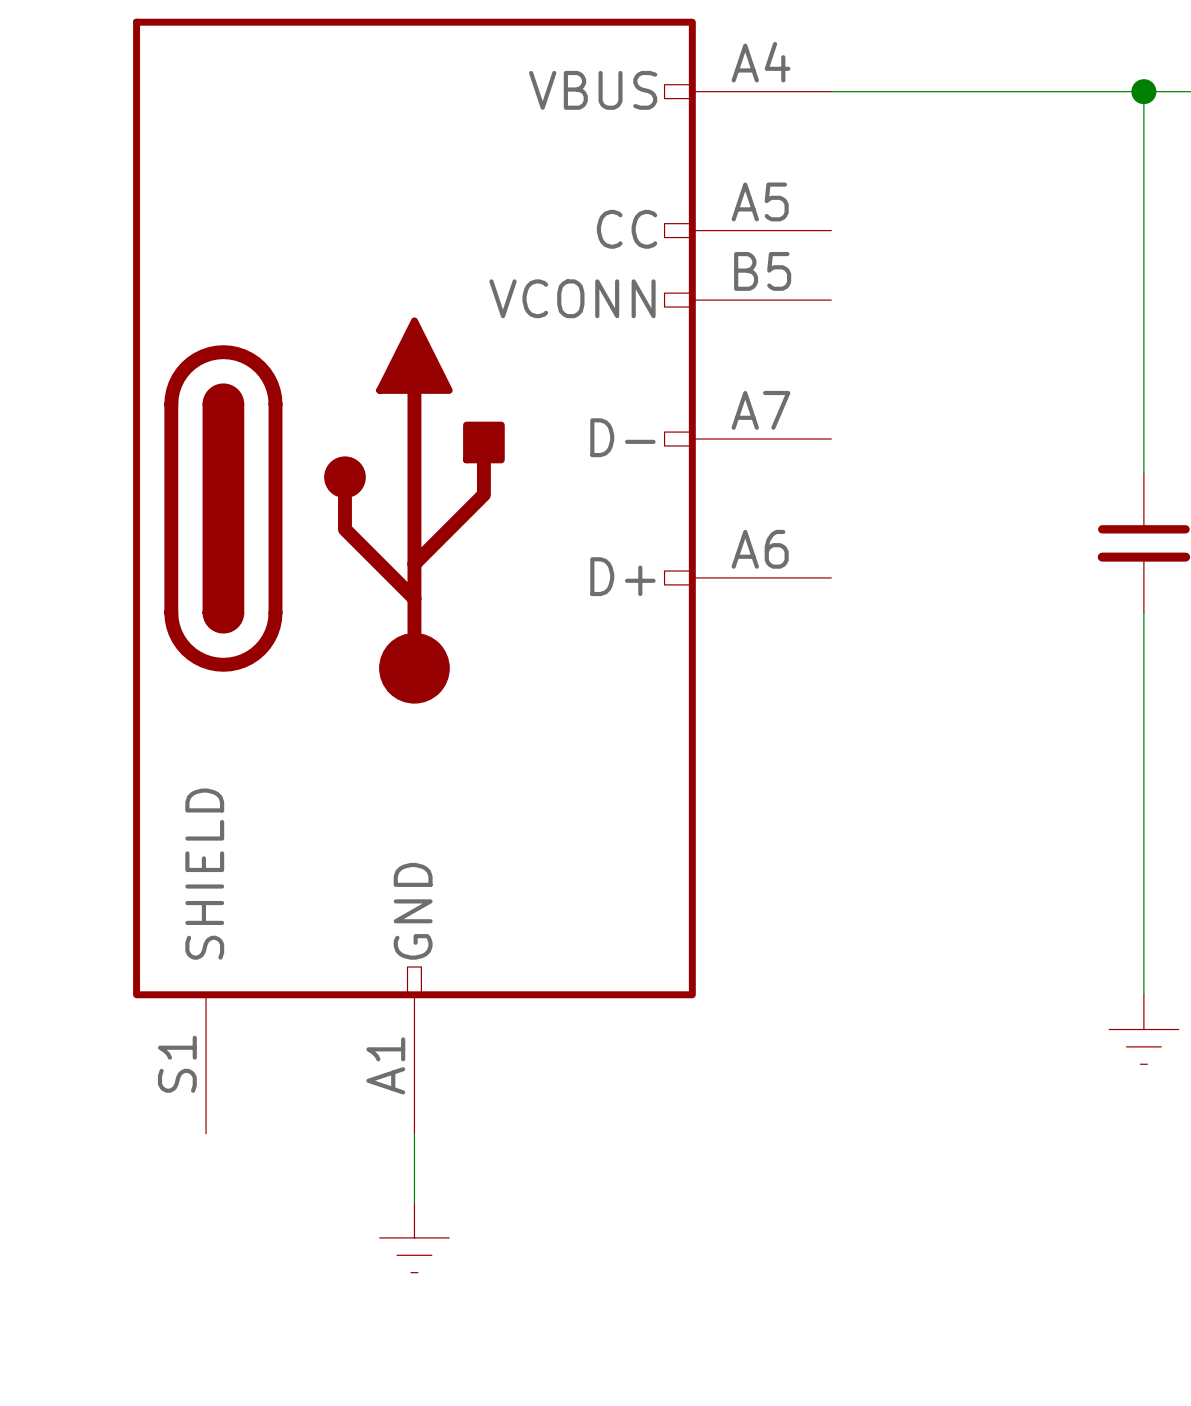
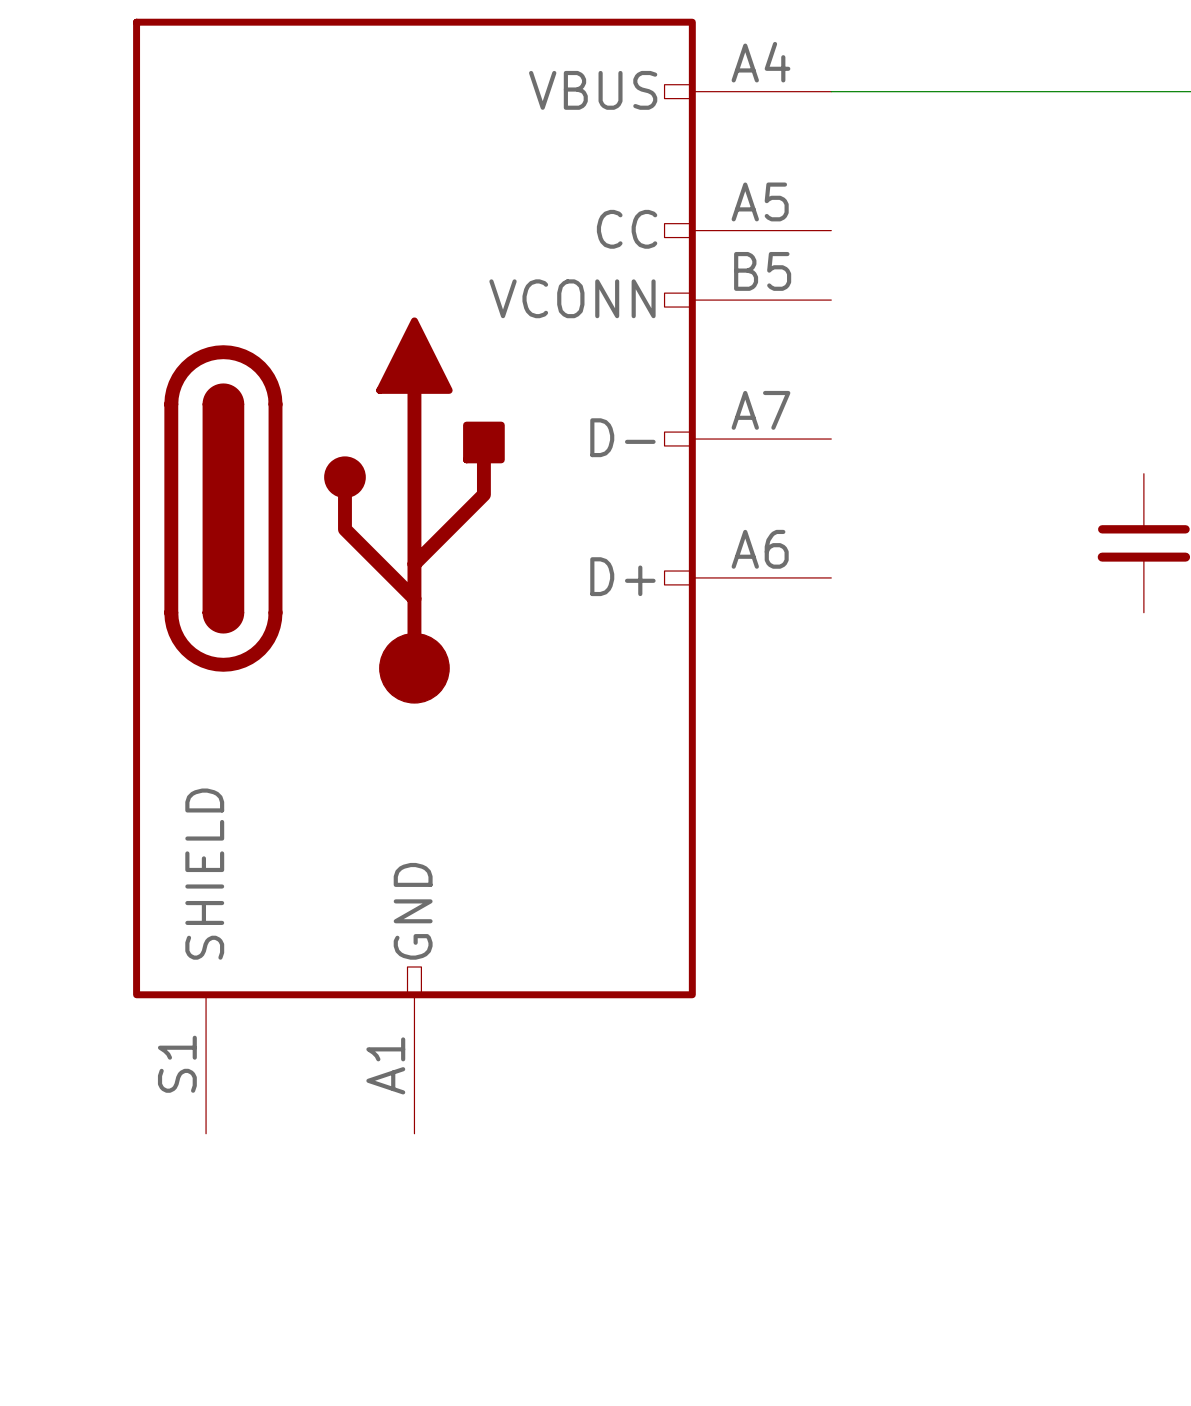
wire: (1143, 91) (1143, 473) -> none
junction: (1143, 91) -> none
wire: (1143, 612) (1143, 994) -> none
power symbol: (1143, 1029) -> none
wire: (414, 1133) (414, 1203) -> none
power symbol: (414, 1237) -> none

